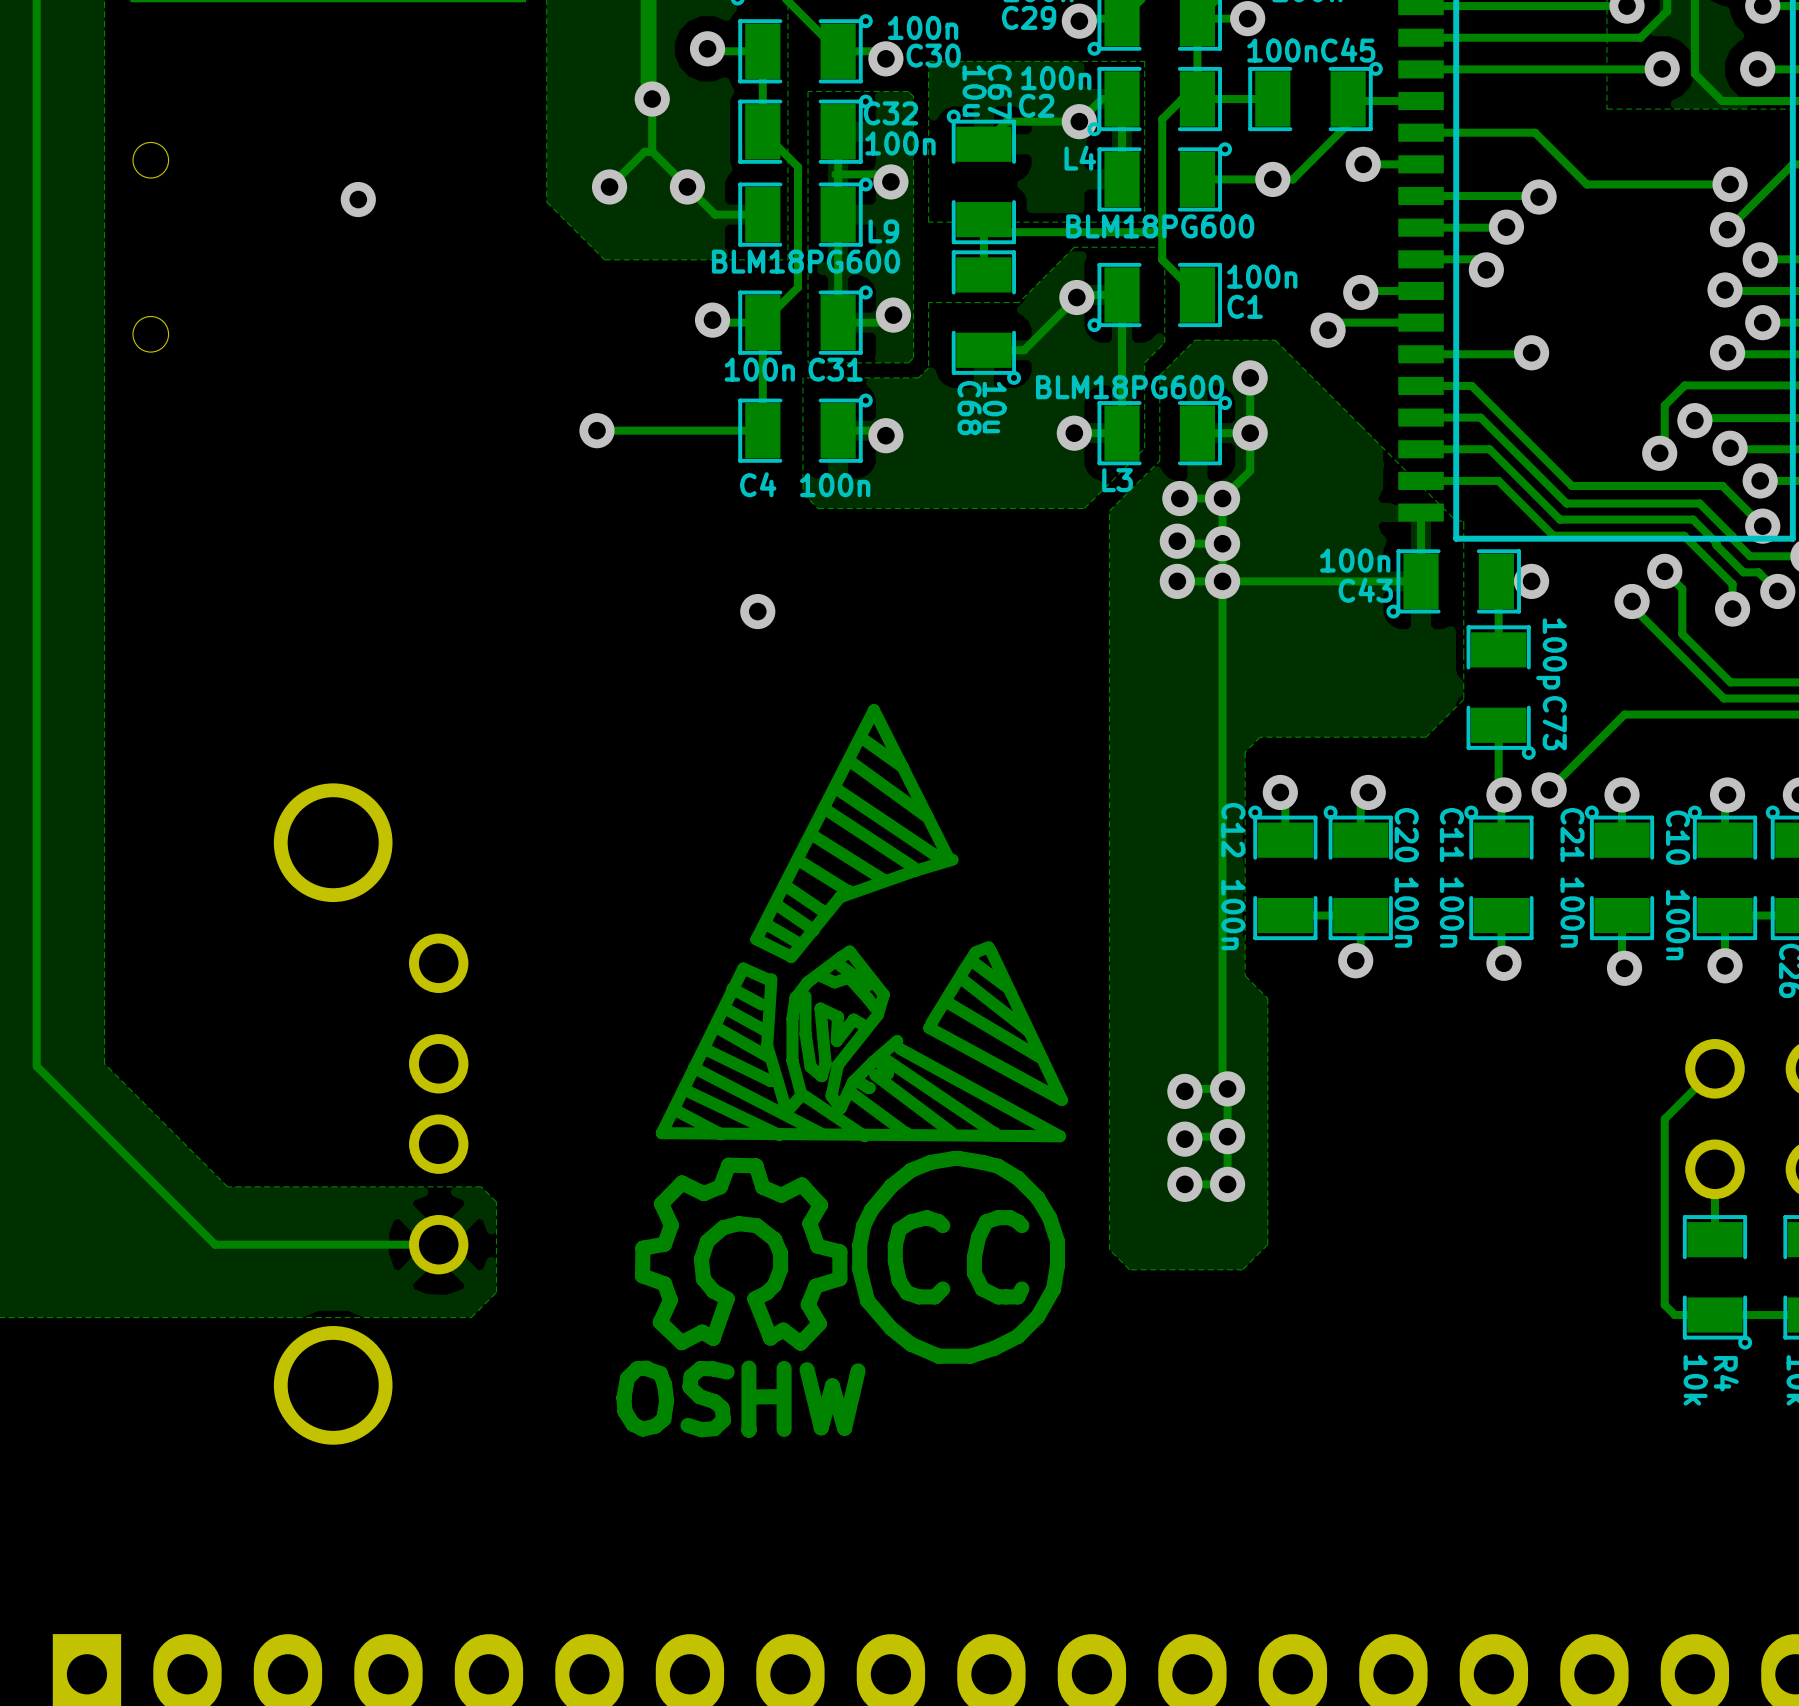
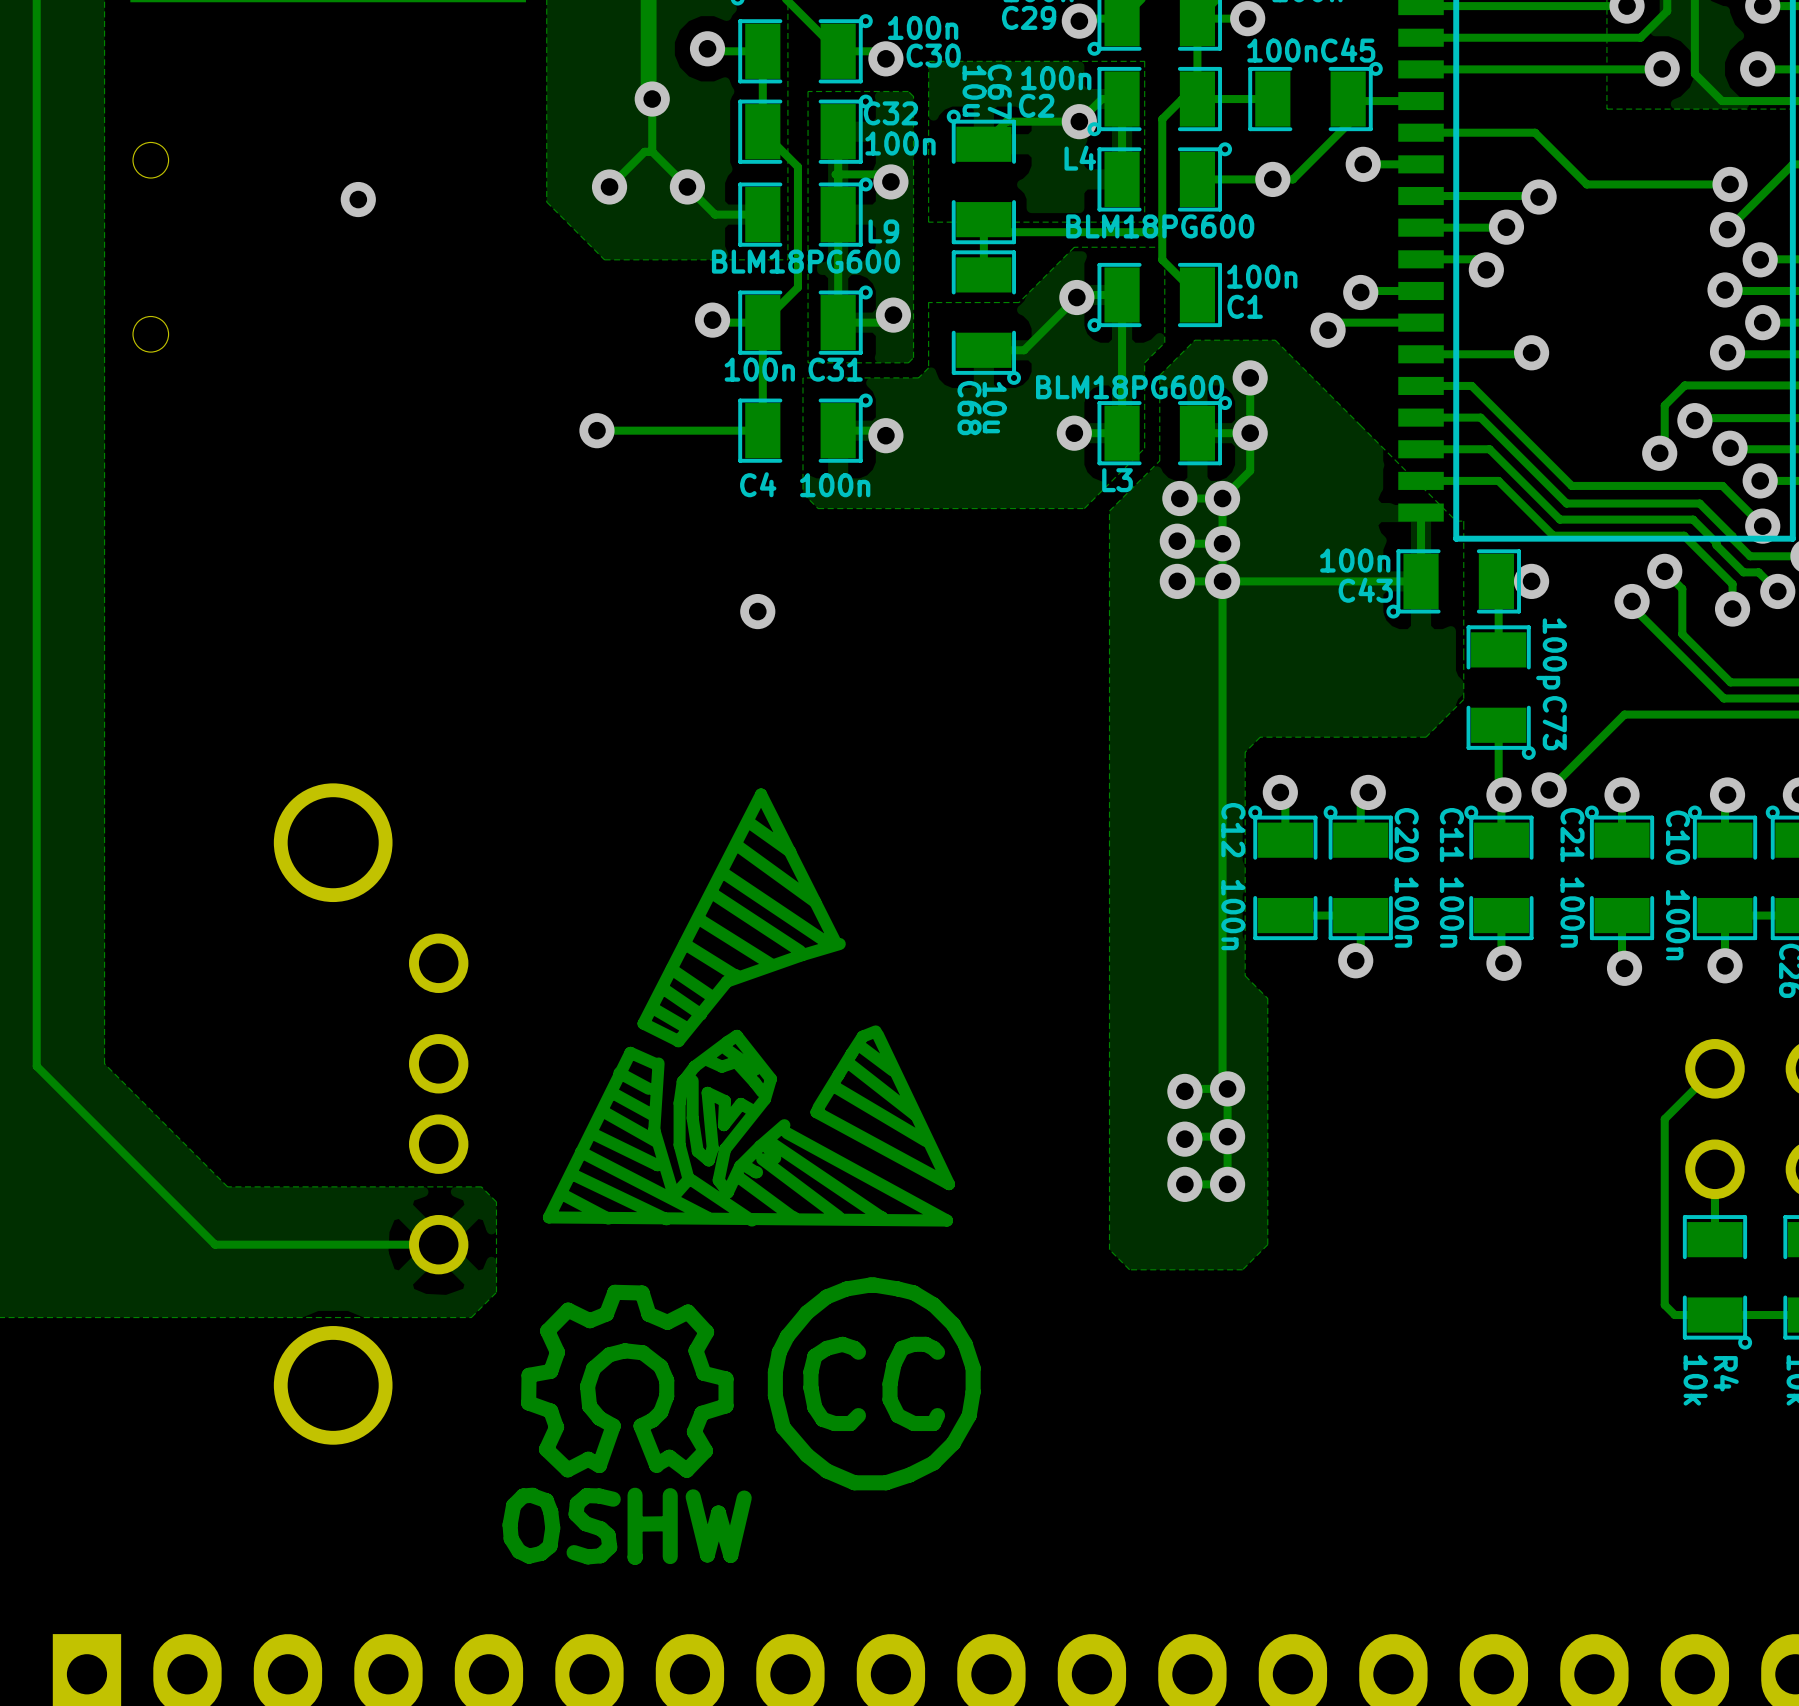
drawing position: (861, 923) -> (748, 1007)
drawing position: (958, 1257) -> (874, 1383)
drawing position: (740, 1297) -> (627, 1424)

